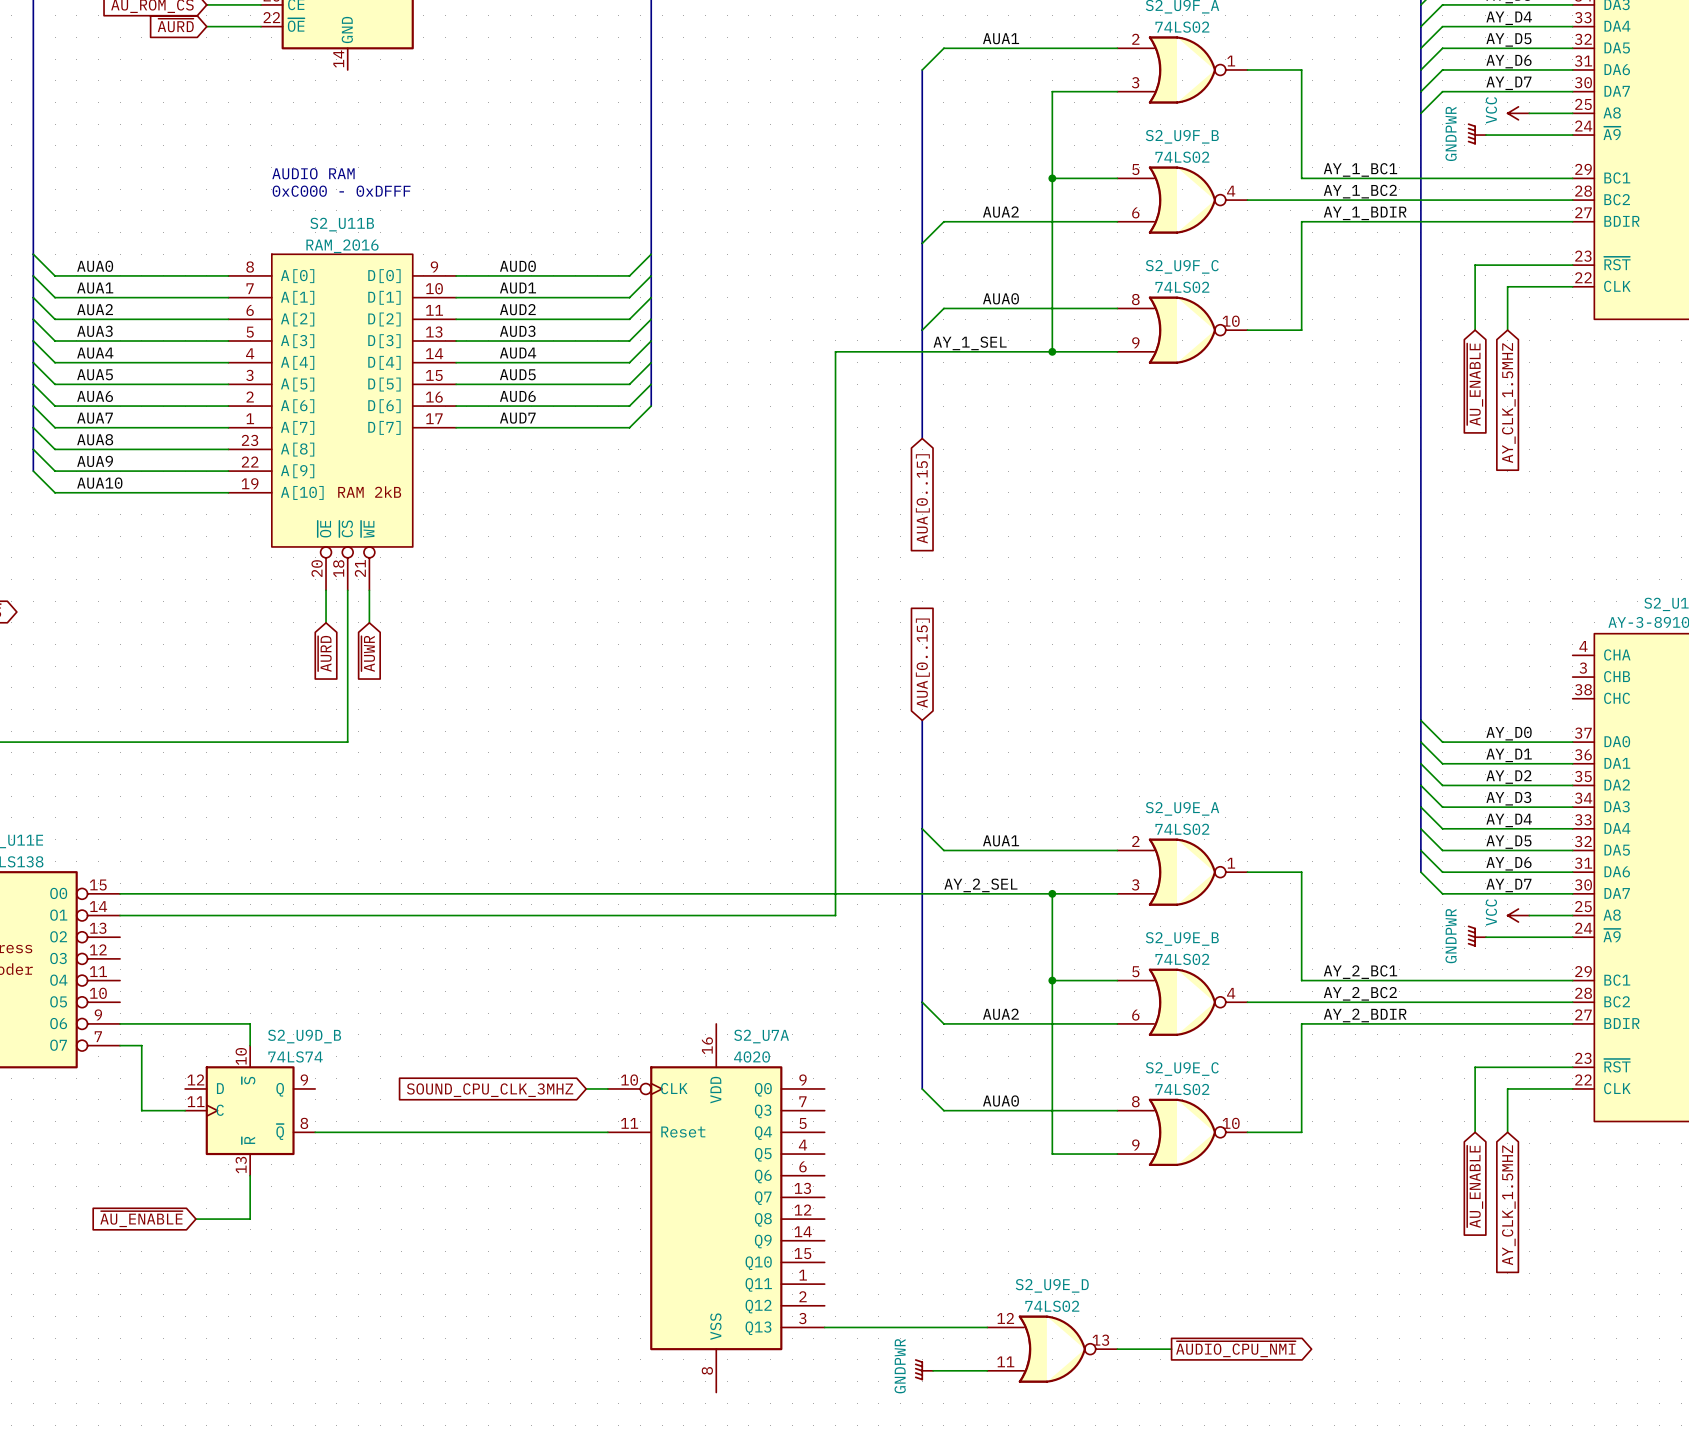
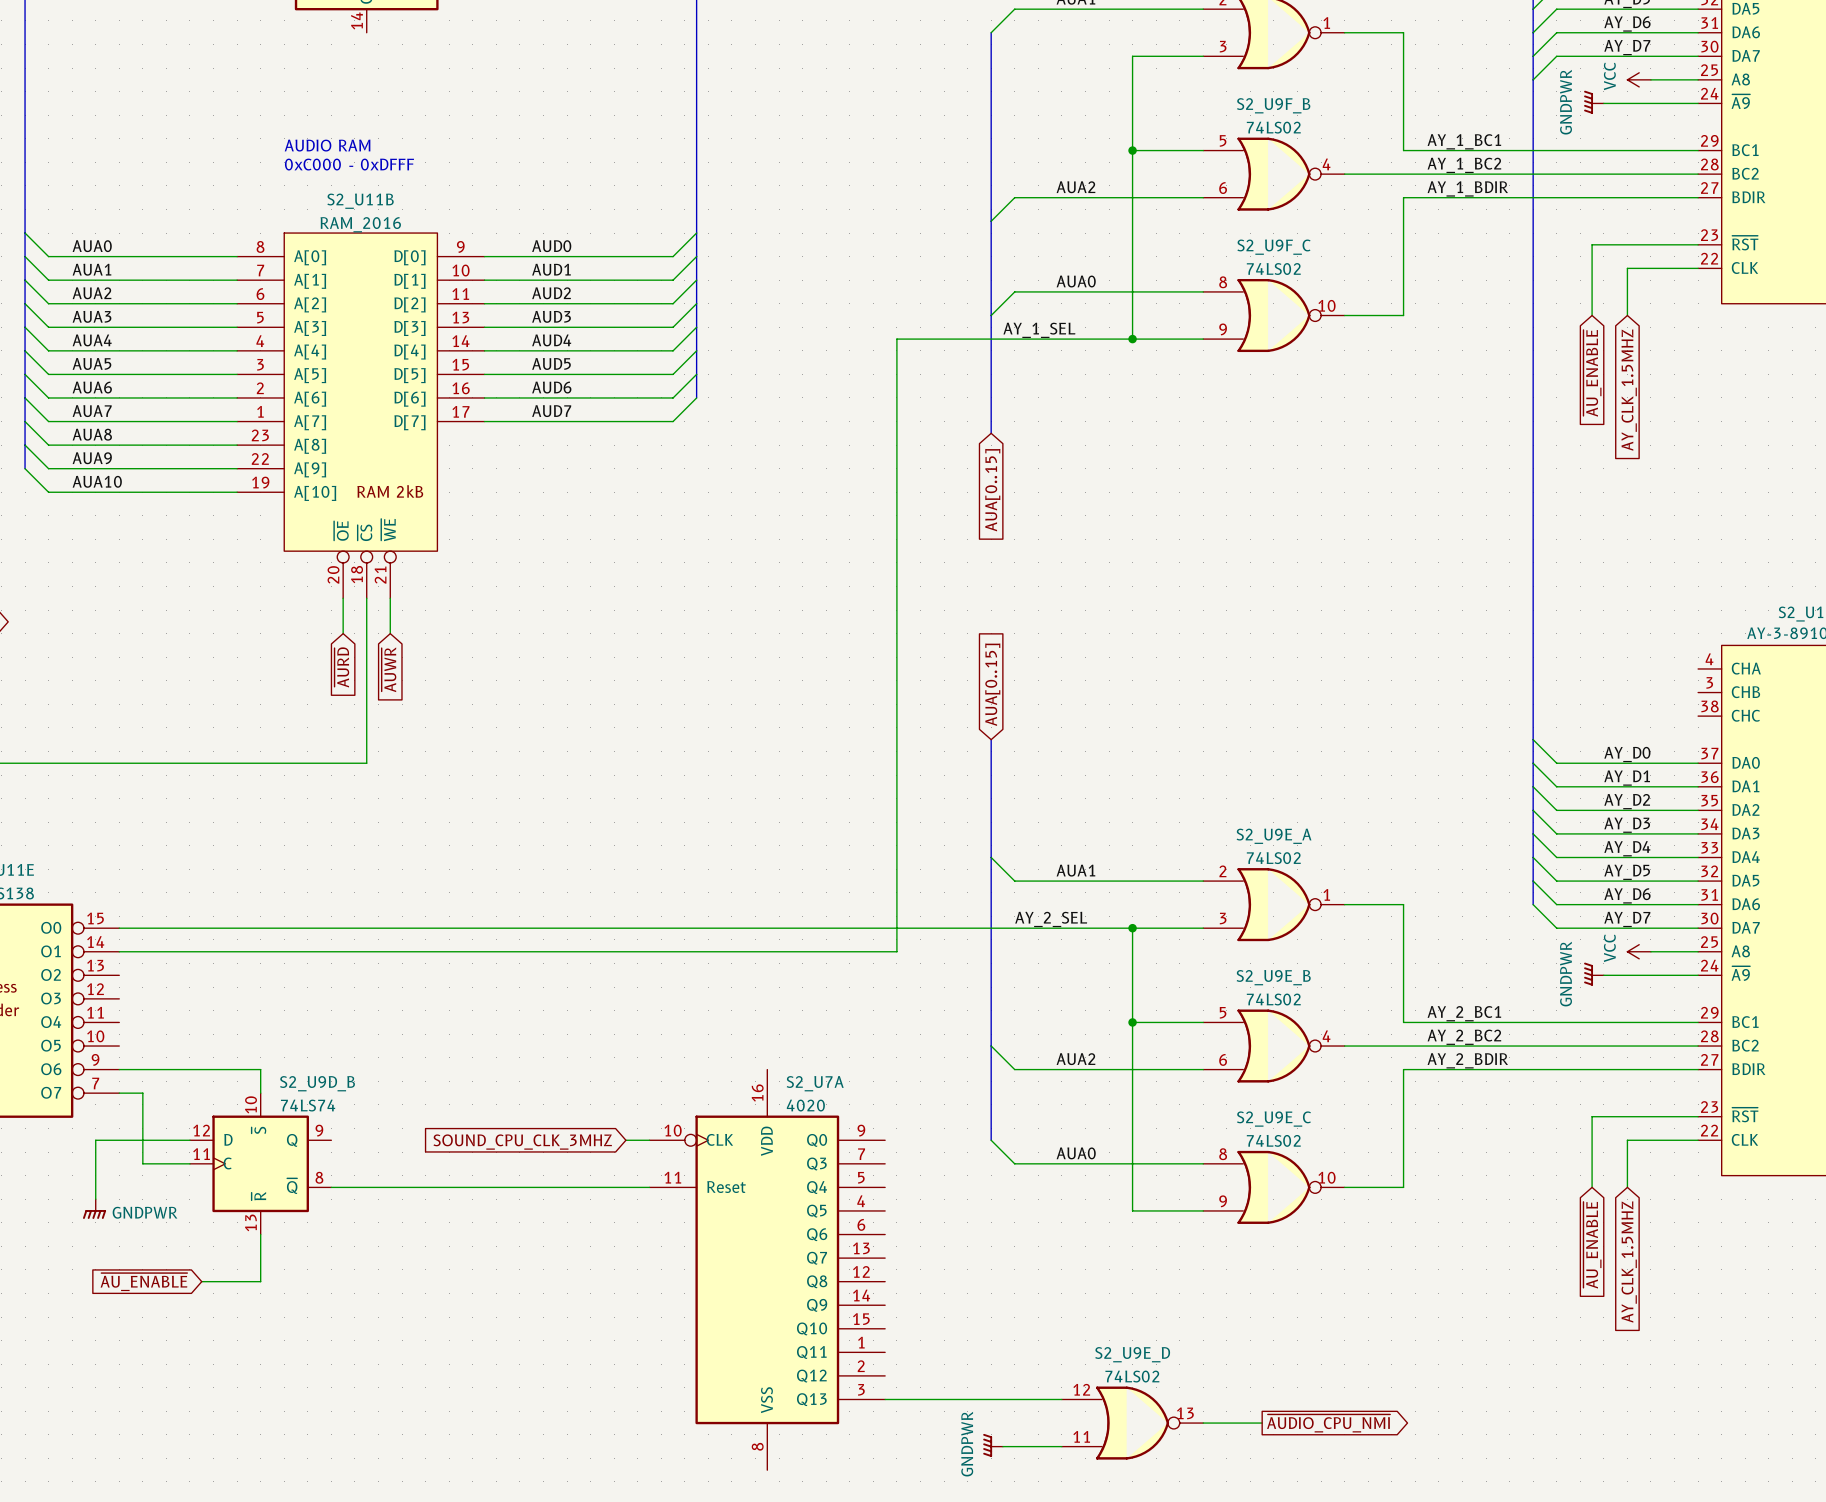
wire: none -> (189, 1140) (95, 1140) (95, 1199)
power symbol: none -> GNDPWR (94, 1209)

